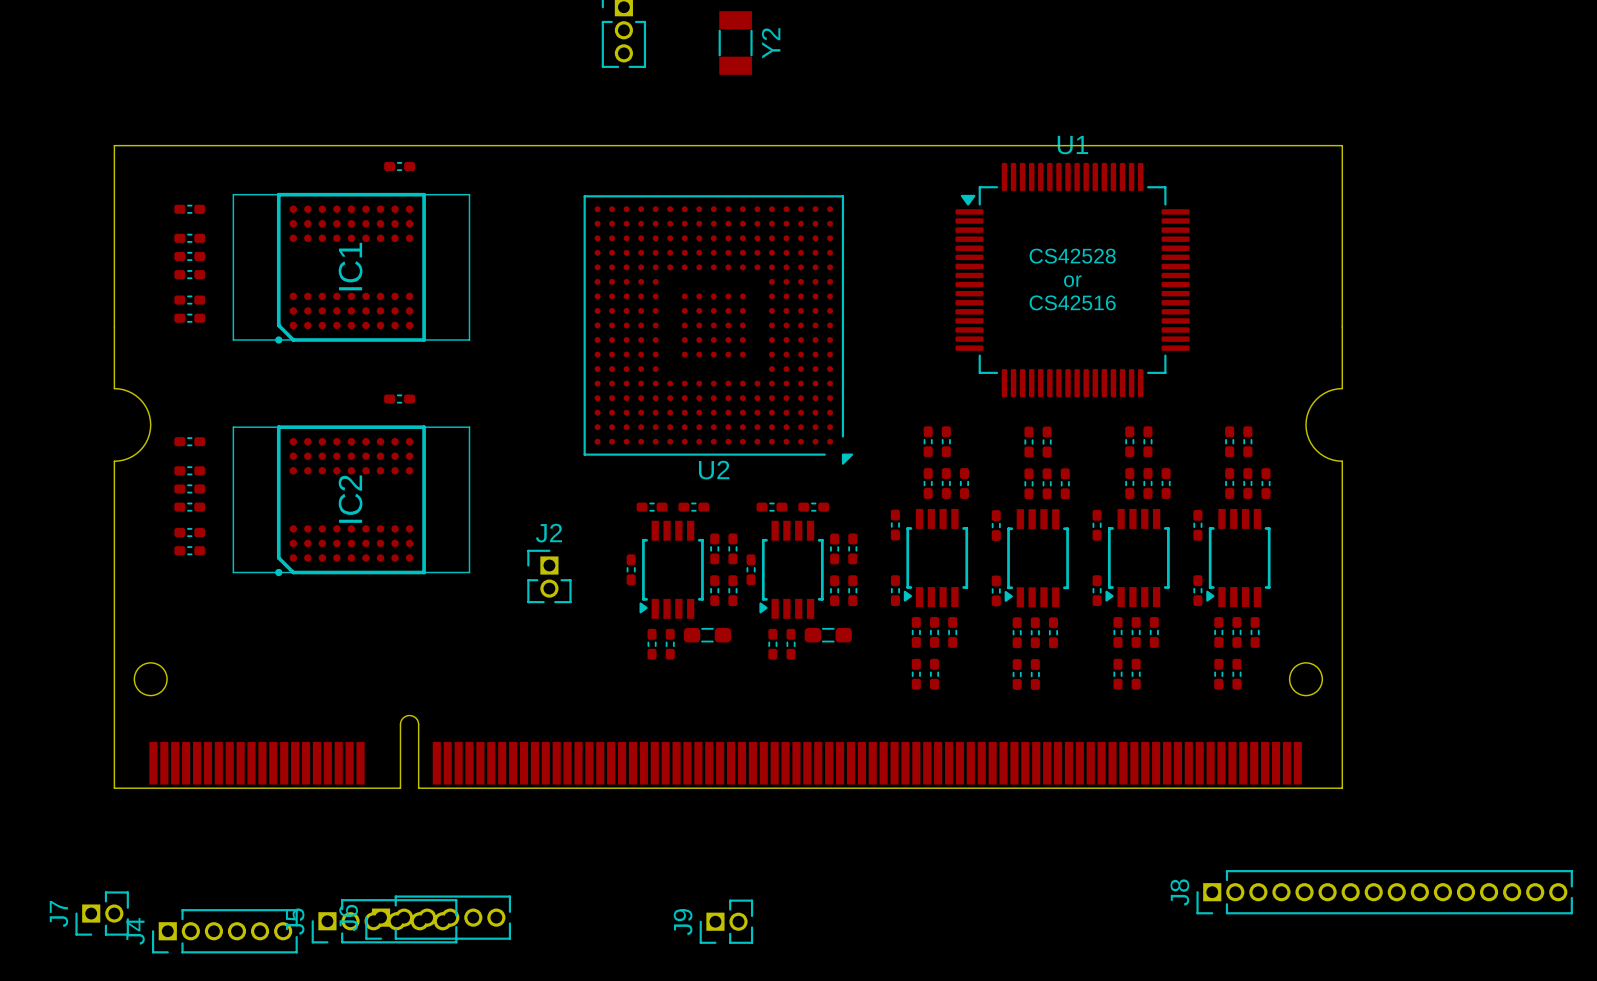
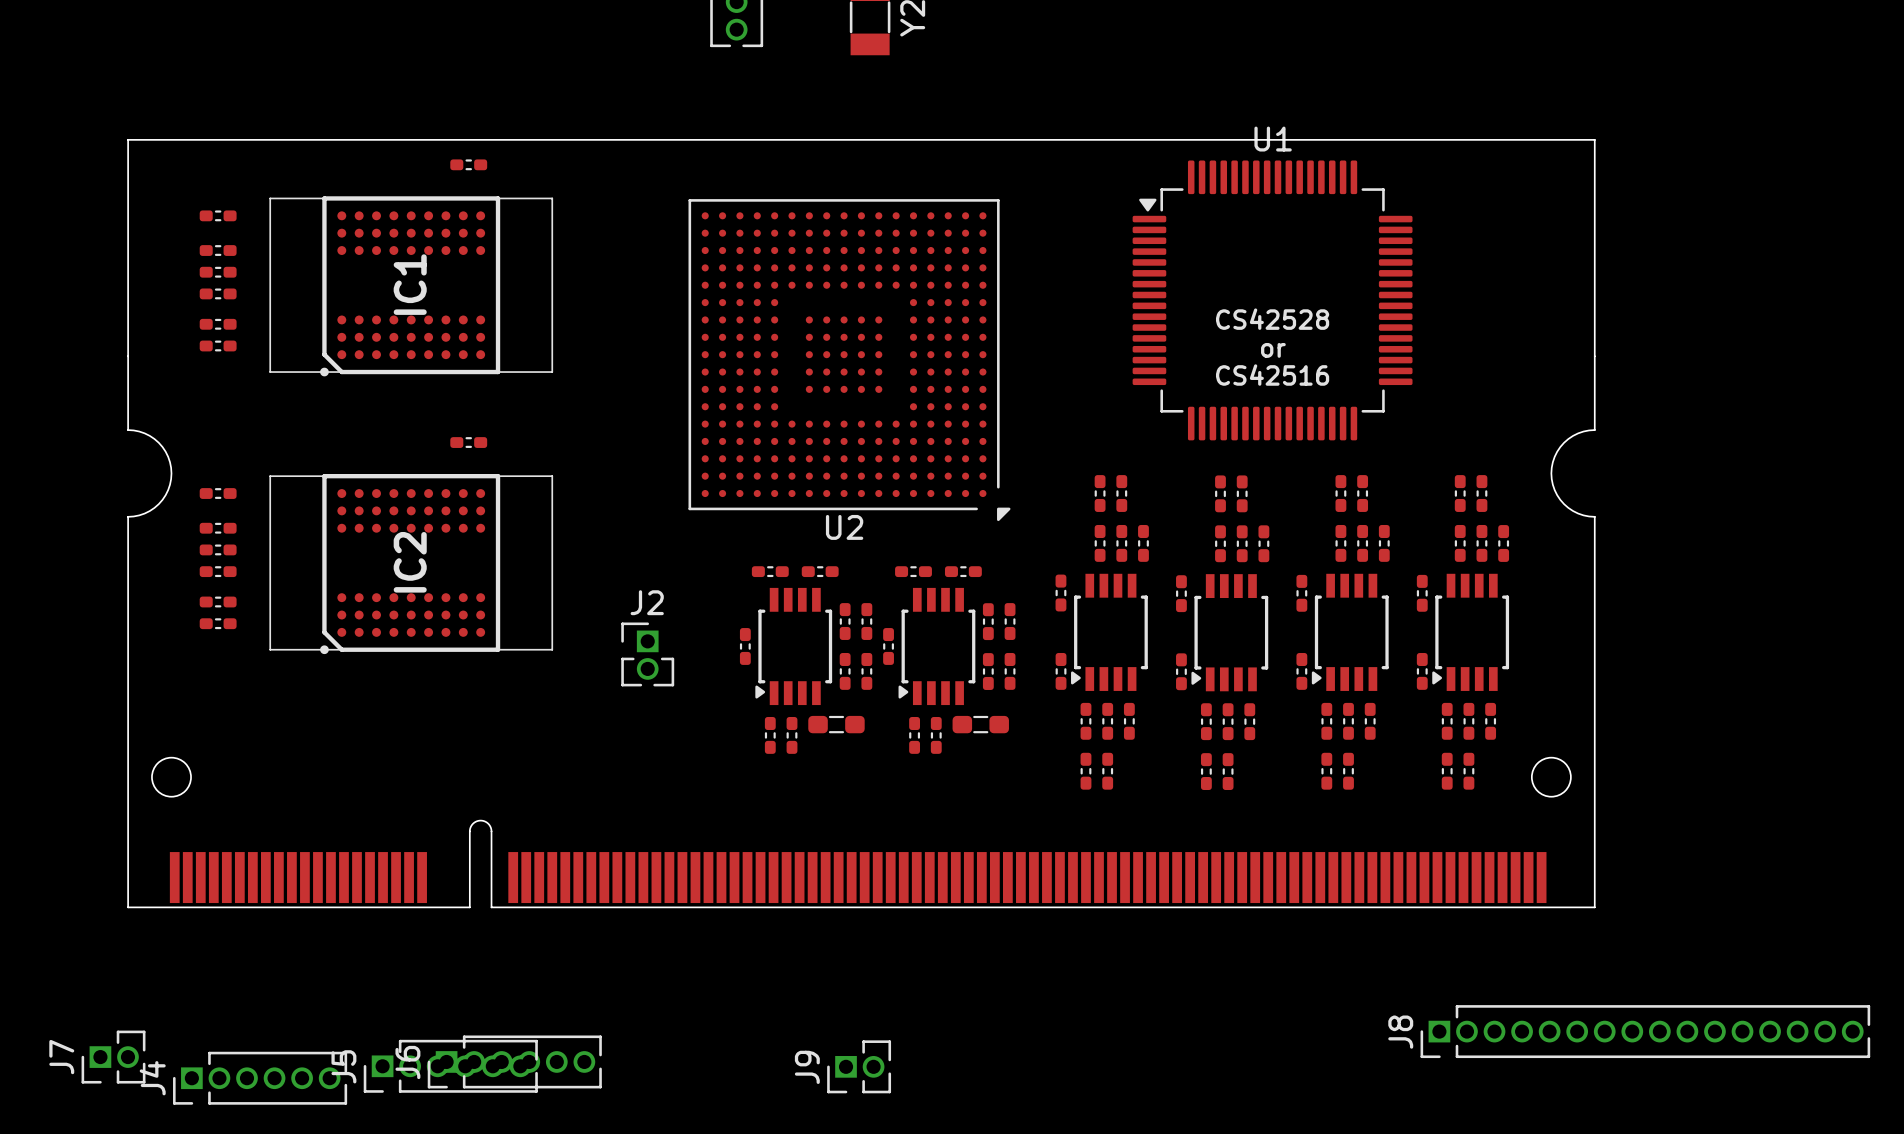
text position: CS42528 (1072, 256) -> CS42528 (1272, 319)
text position: or (1072, 281) -> or (1273, 350)
text position: CS42516 (1072, 302) -> CS42516 (1272, 375)

